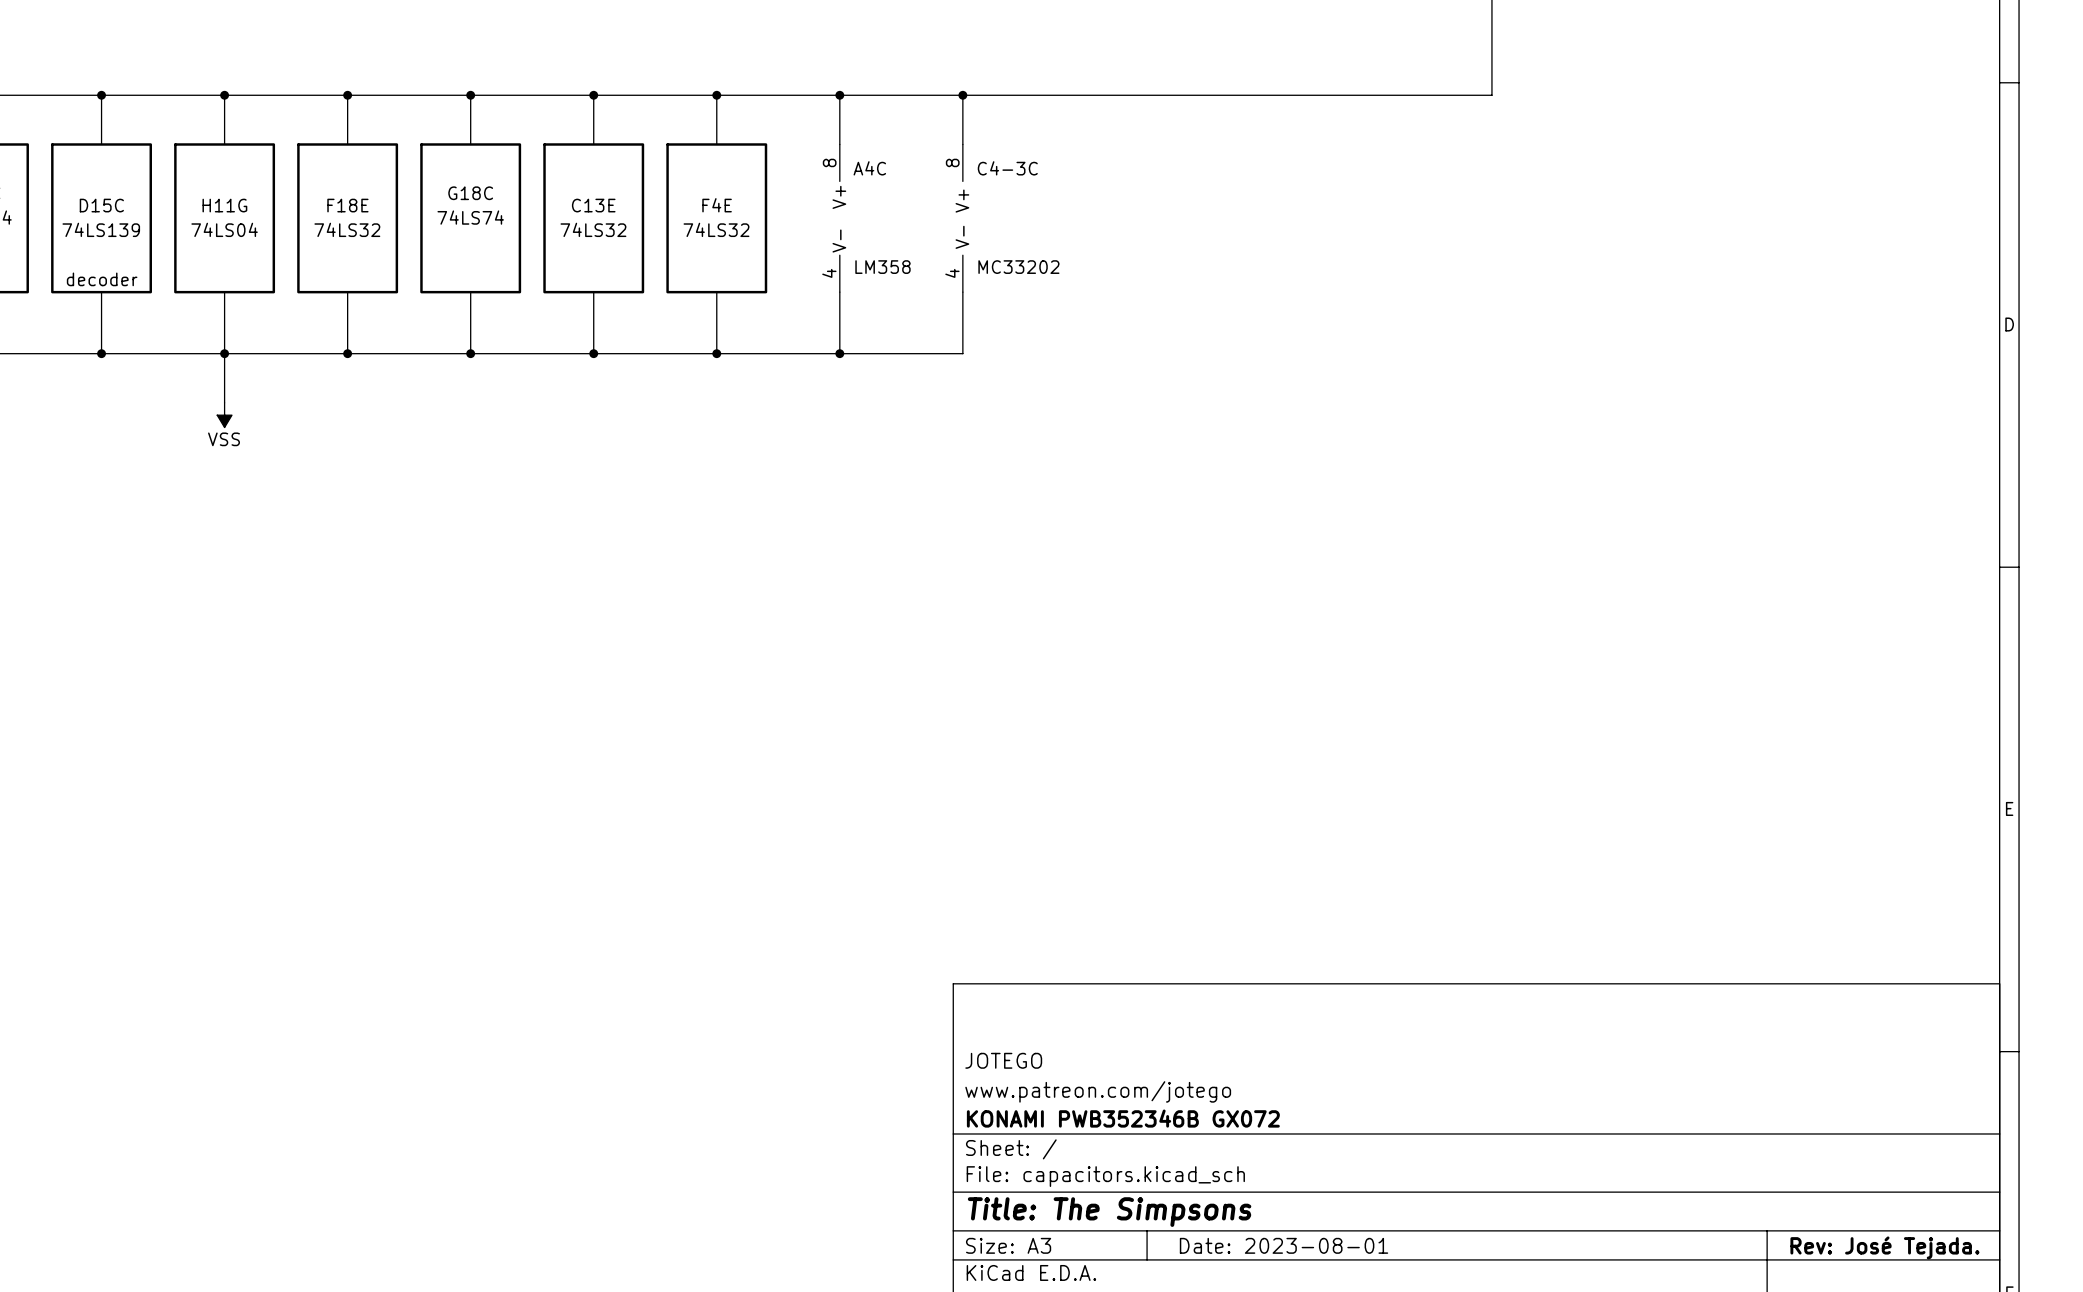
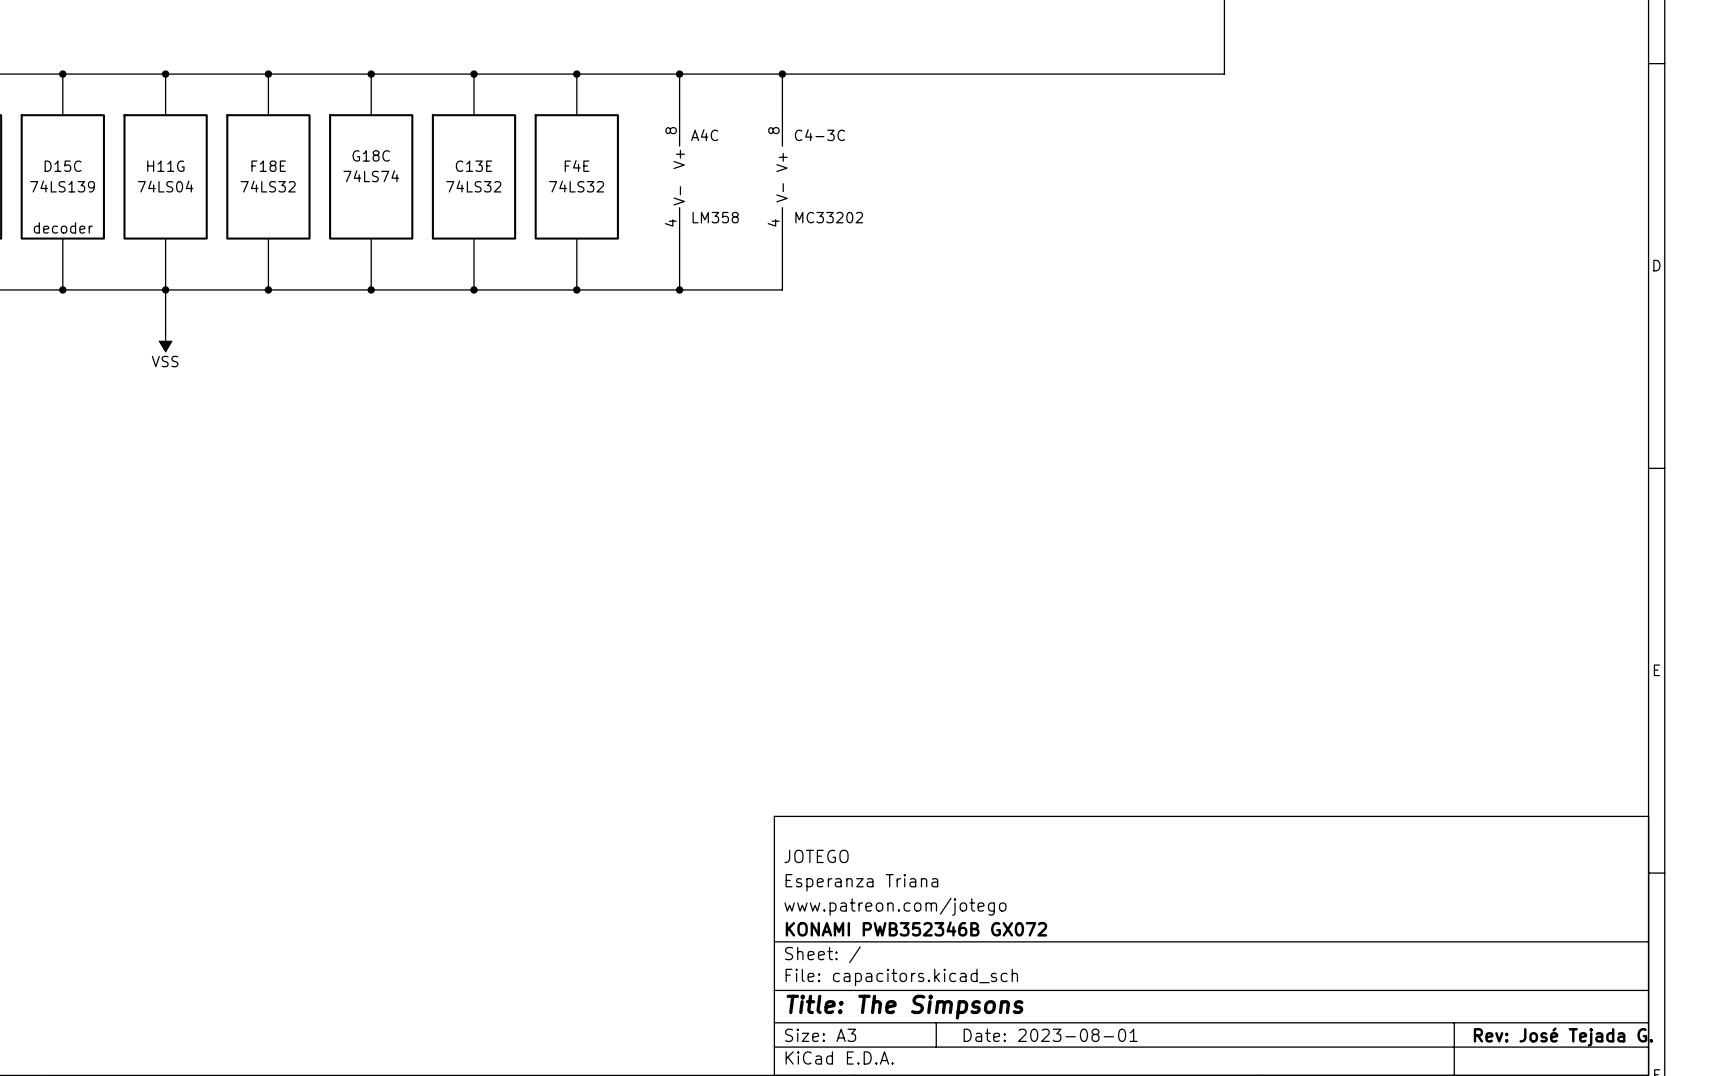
title block: none -> JOTEGO (816, 856)
title block: JOTEGO (1003, 1060) -> Esperanza Triana (861, 882)
title block: Rev: José Tejada. (1884, 1247) -> Rev: José Tejada G. (1563, 1037)

